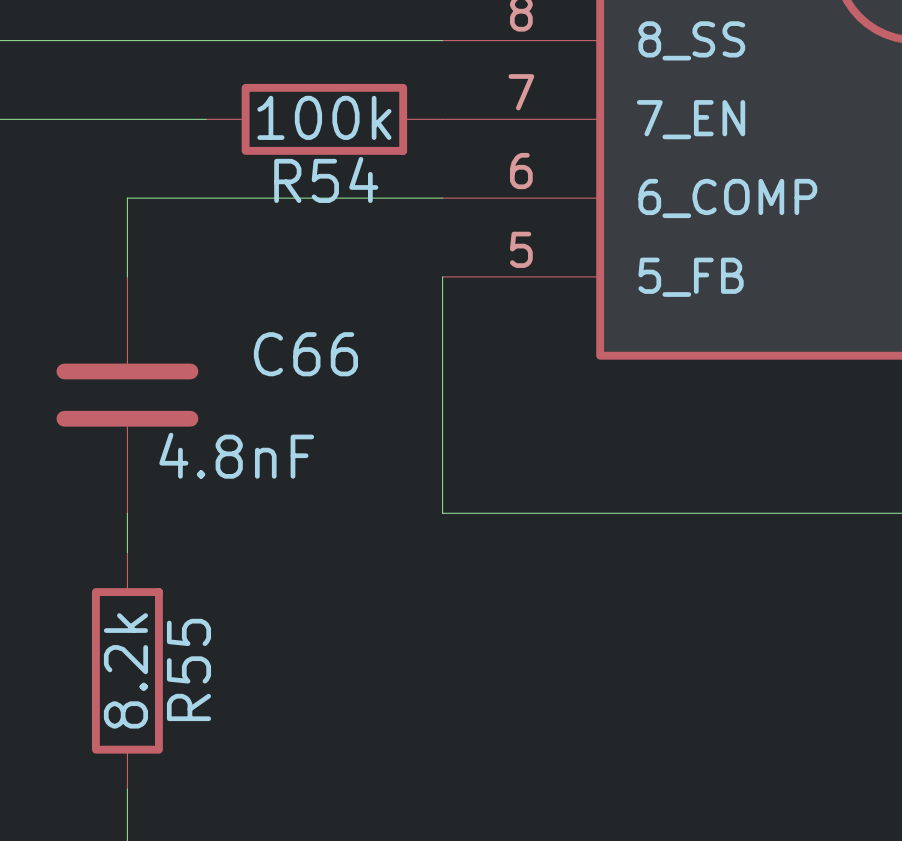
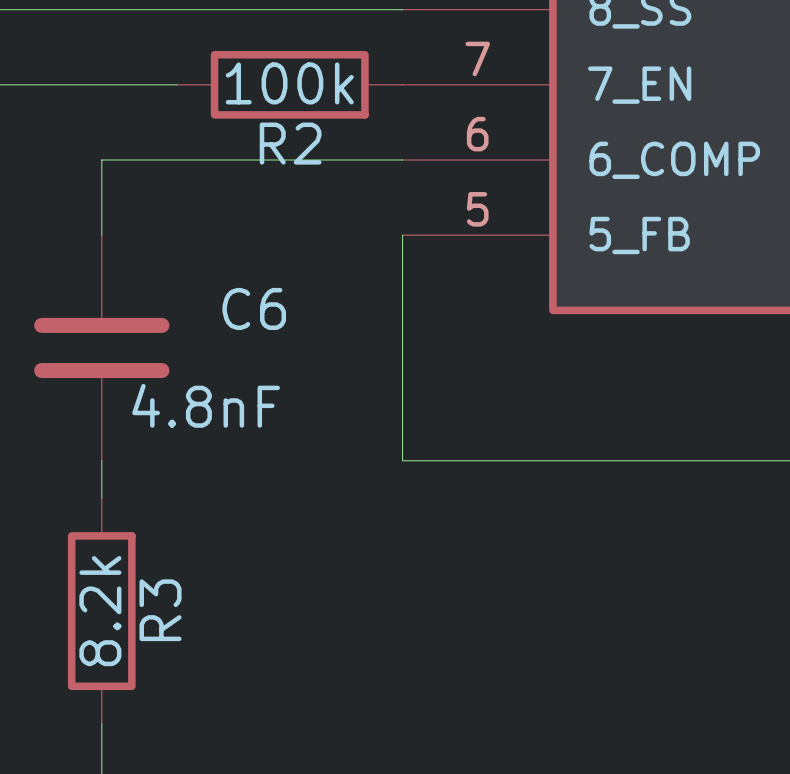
R54 name: R54 (326, 179) -> R2 (290, 143)
C66 name: C66 (305, 354) -> C6 (254, 308)
R55 name: R55 (188, 669) -> R3 (160, 610)

